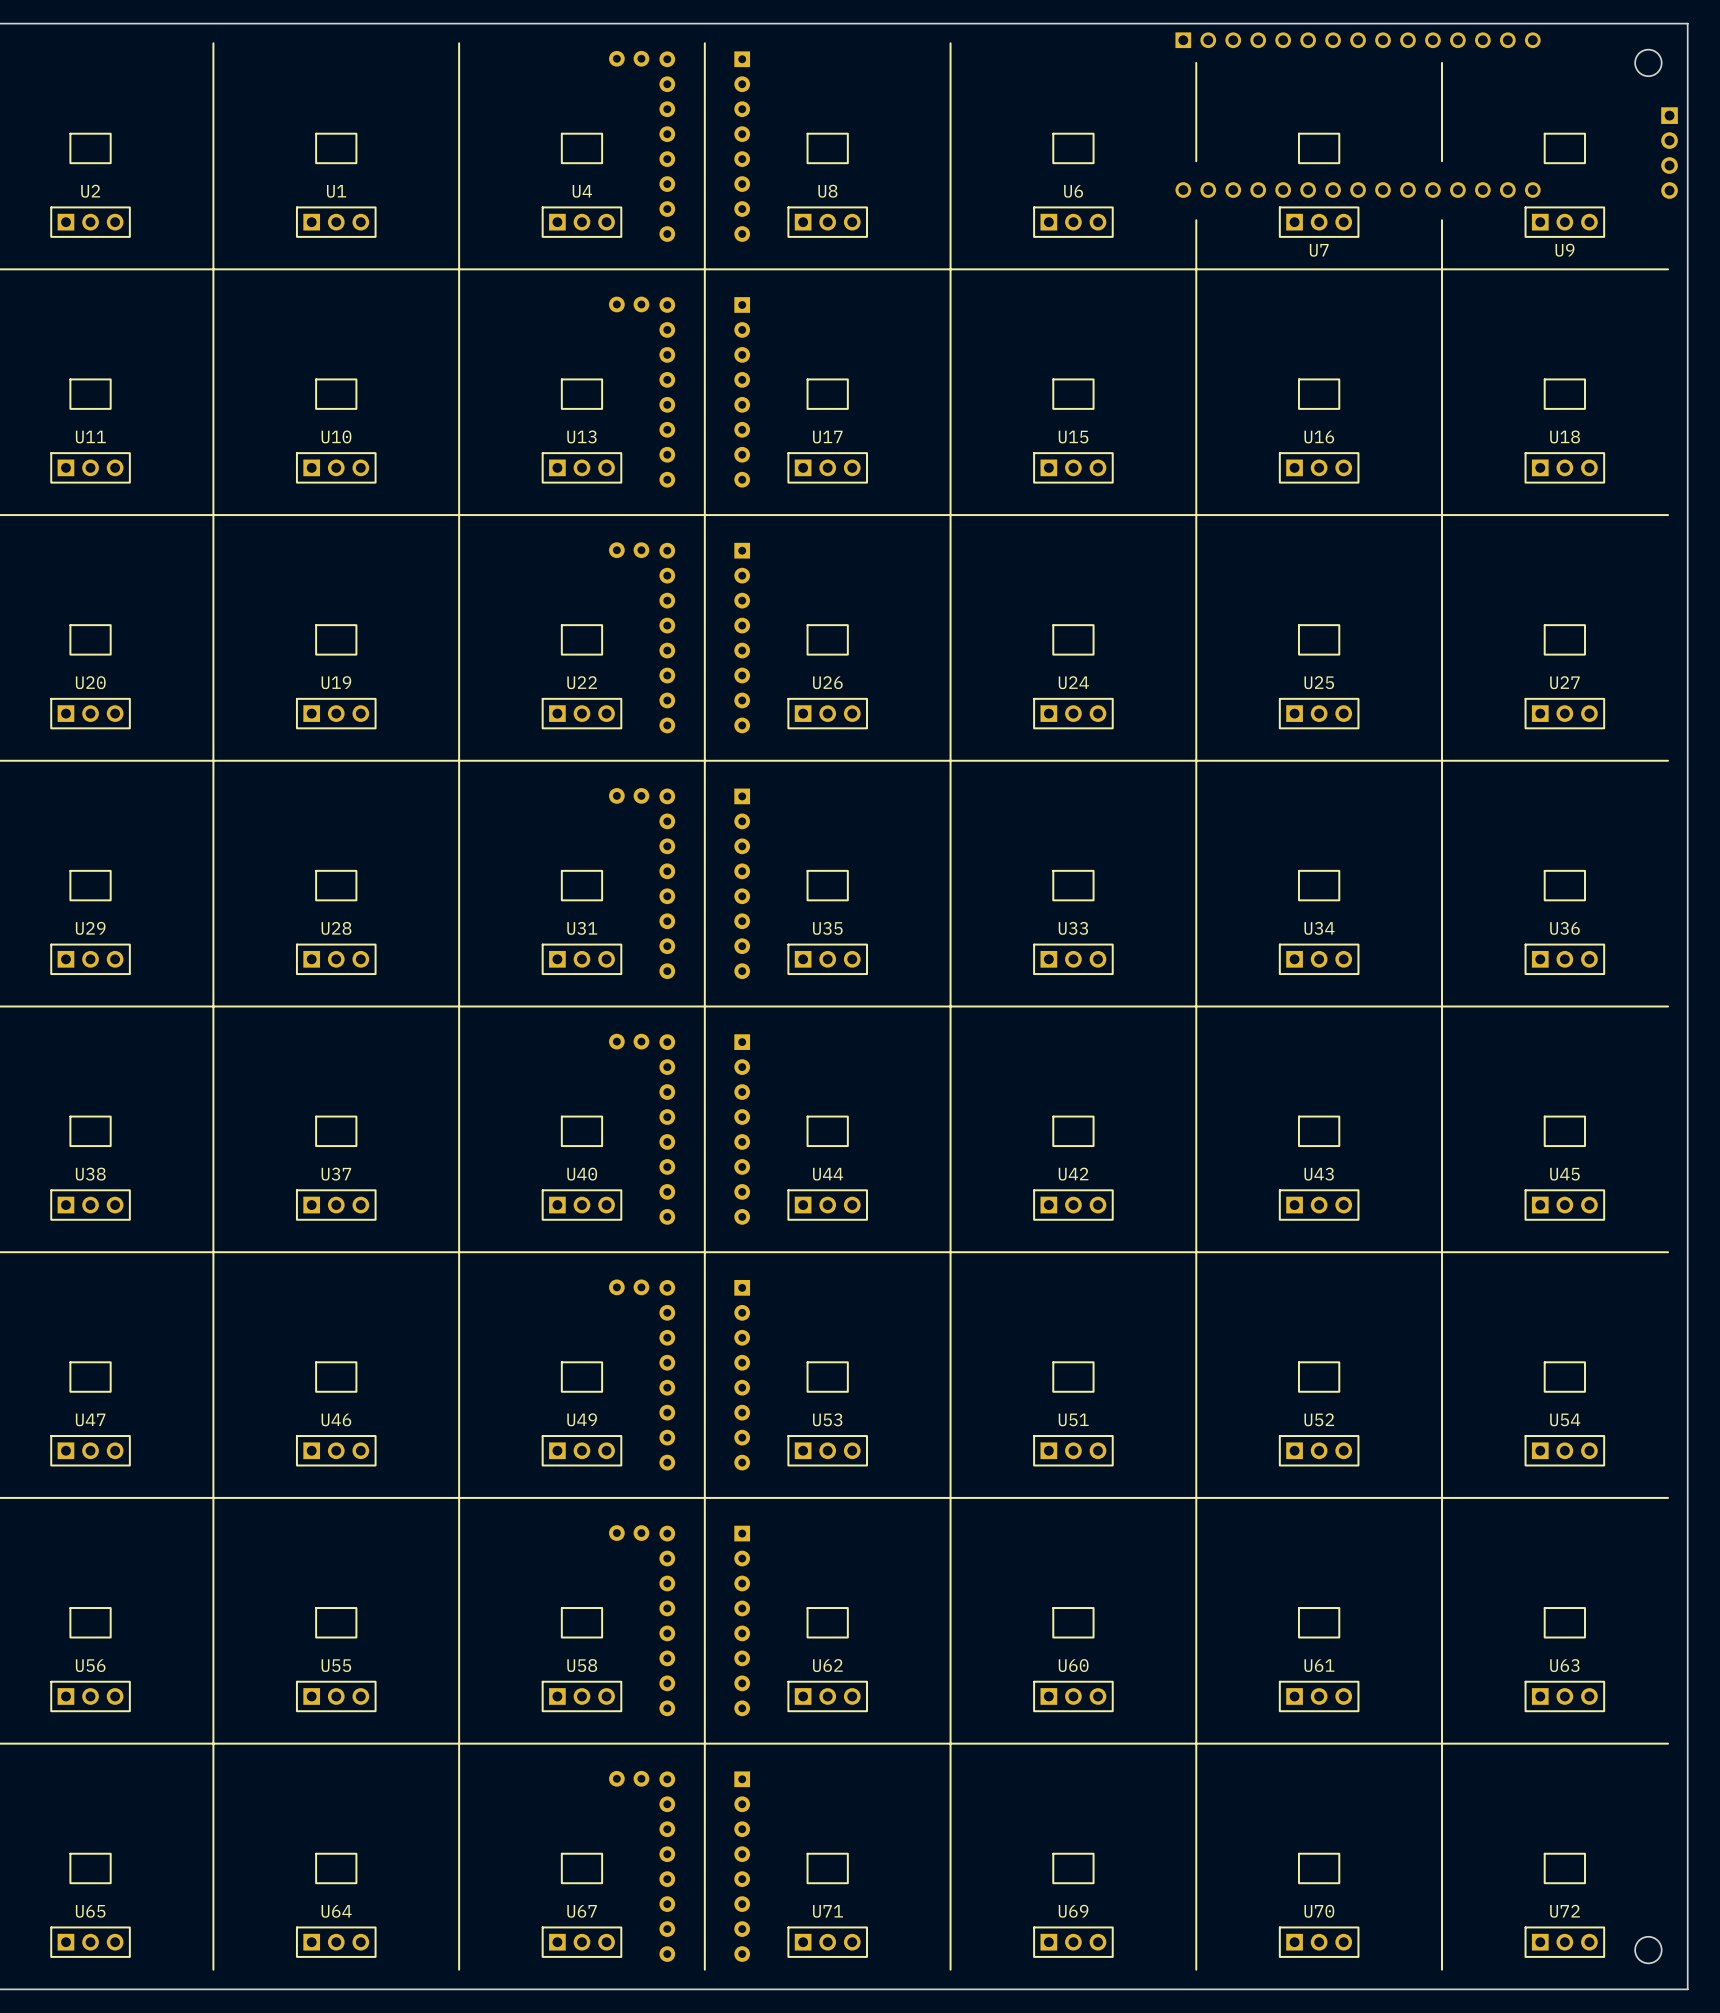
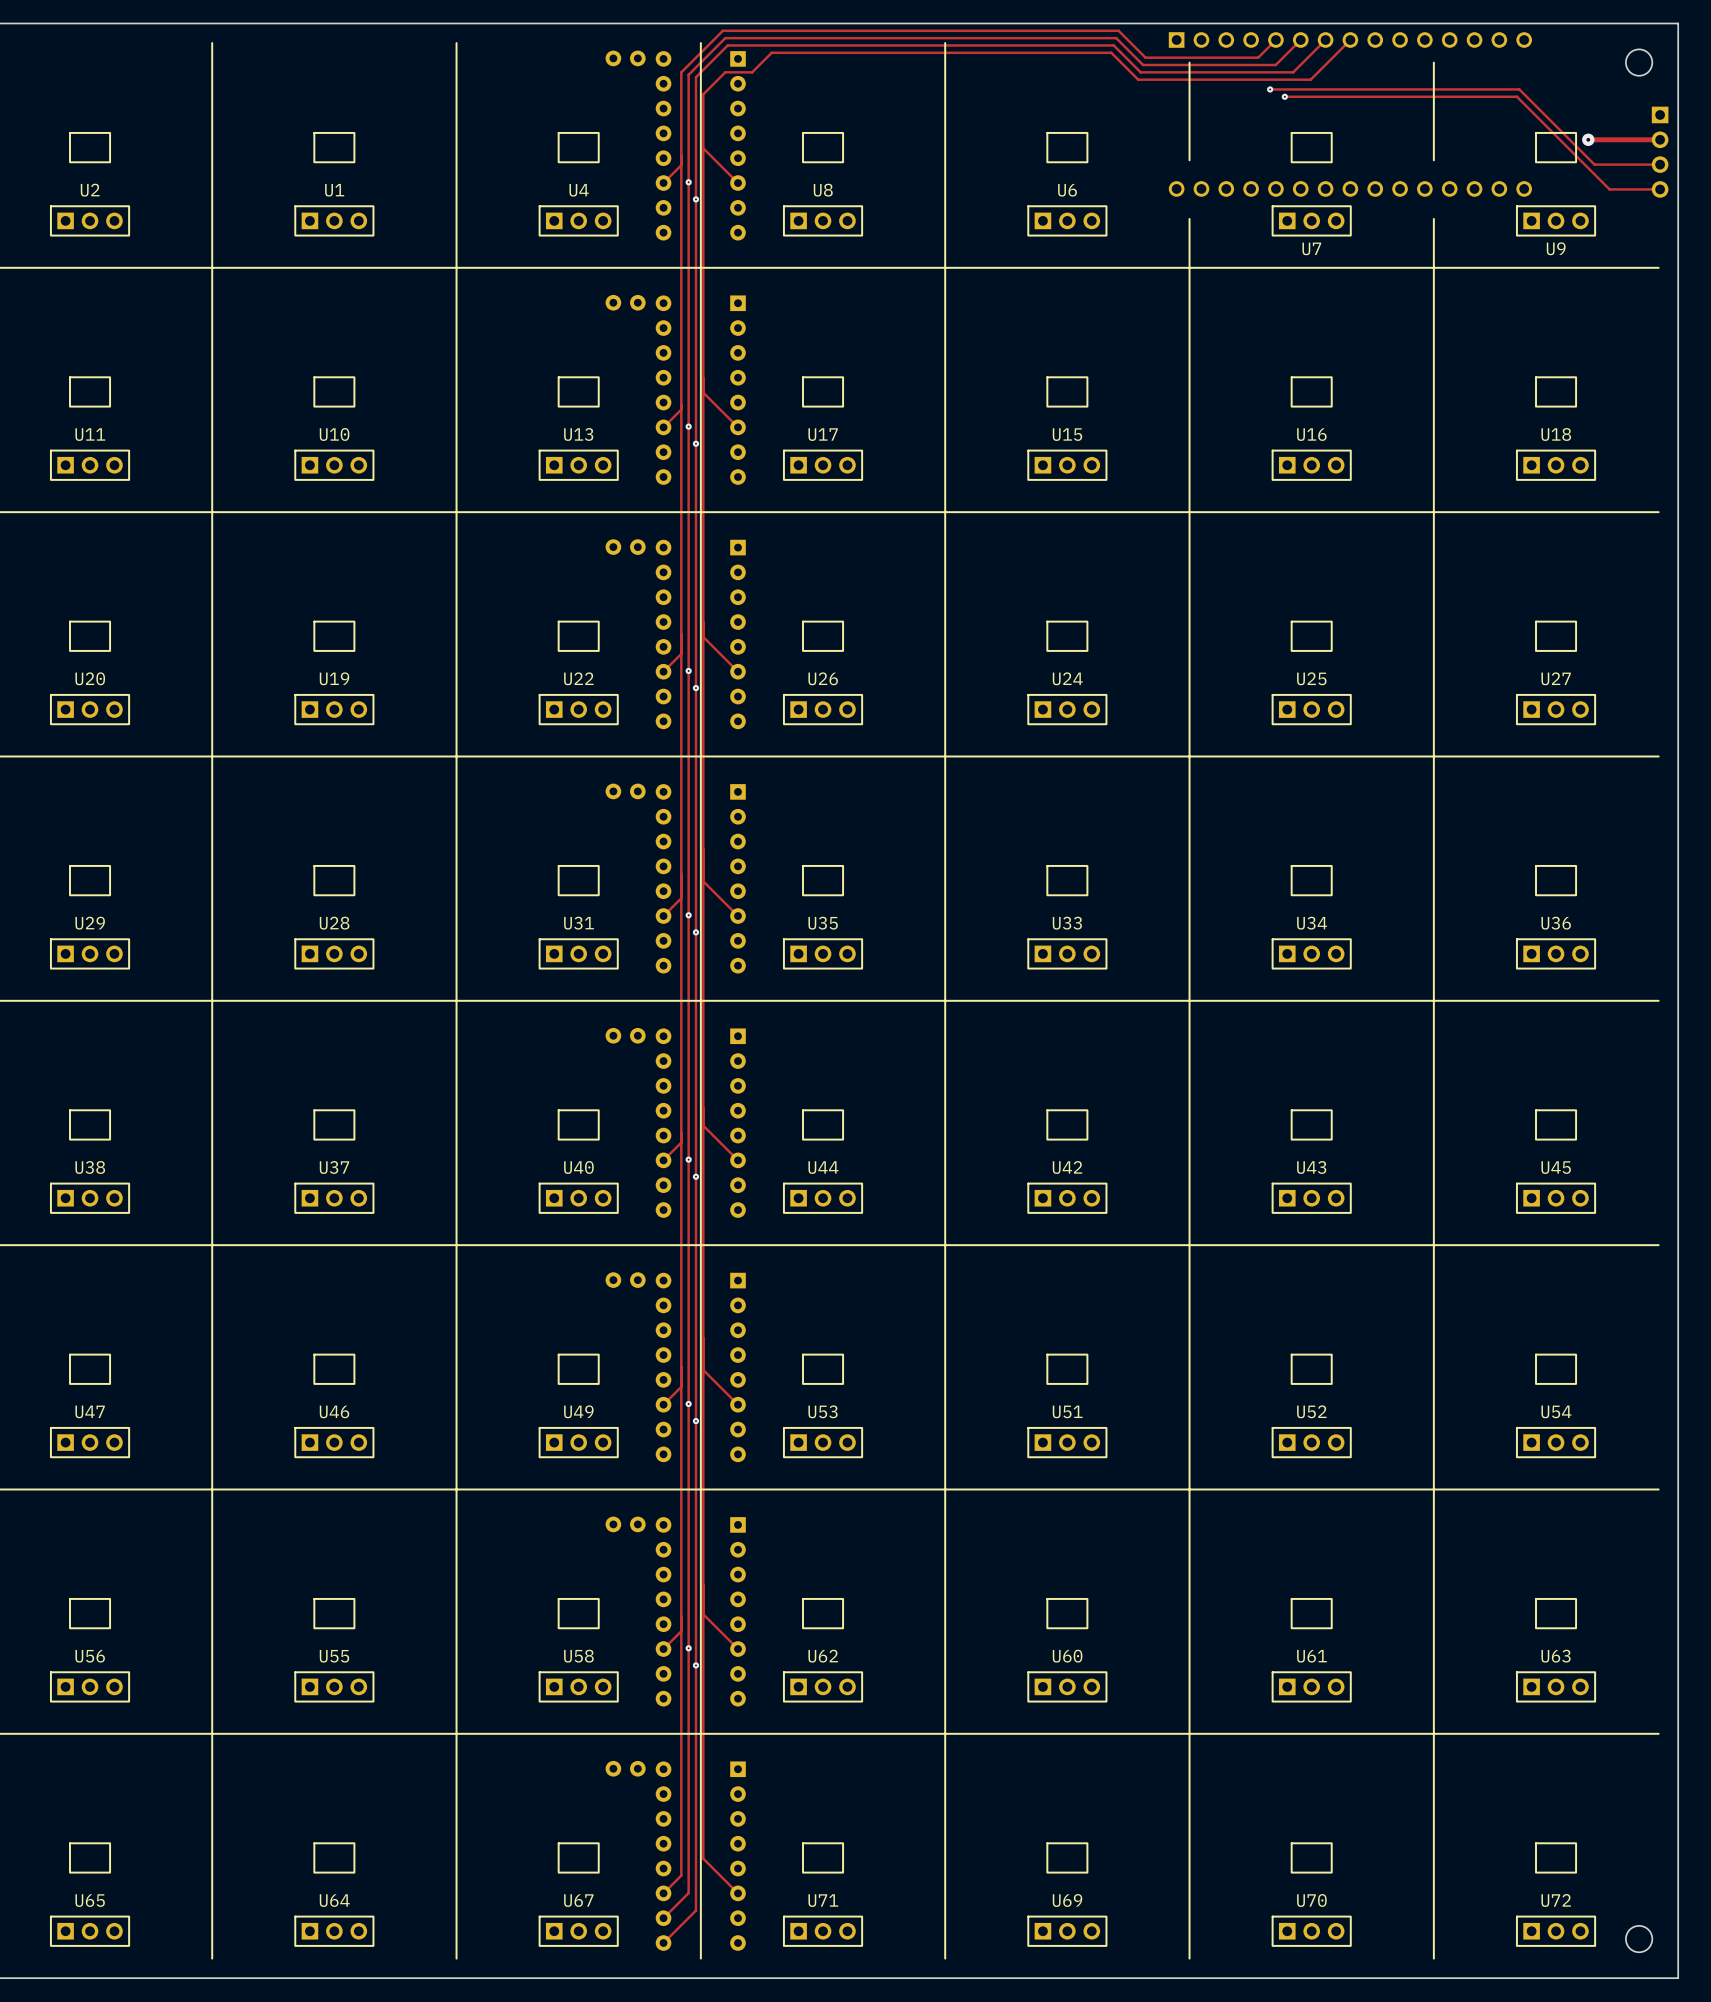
track: none -> (1275, 40) (1258, 57) (1145, 57) (1118, 30) (722, 30) (681, 72) (681, 1875) (663, 1893)
track: none -> (1300, 40) (1275, 65) (1143, 65) (1116, 38) (725, 38) (688, 74) (688, 1893) (663, 1918)
track: none -> (1325, 40) (1293, 72) (1140, 72) (1113, 45) (727, 45) (695, 77) (695, 1910) (663, 1943)
track: none -> (1350, 40) (1310, 79) (1138, 79) (1111, 52) (771, 52) (752, 72) (725, 72) (703, 94) (703, 1858) (738, 1893)
track: none -> (1270, 89) (1519, 89) (1594, 164) (1660, 164)
via: none -> (1270, 89)
track: none -> (1284, 96) (1516, 96) (1609, 189) (1660, 189)
via: none -> (1284, 96)
track: none -> (1588, 139) (1660, 139)
via: none -> (1588, 139)
track: none -> (703, 148) (738, 183)
track: none -> (681, 165) (663, 183)
via: none -> (688, 182)
via: none -> (695, 199)
track: none -> (703, 392) (738, 427)
track: none -> (681, 409) (663, 427)
via: none -> (688, 426)
via: none -> (695, 443)
track: none -> (703, 637) (738, 671)
track: none -> (681, 653) (663, 671)
via: none -> (688, 670)
via: none -> (695, 688)
track: none -> (703, 881) (738, 916)
track: none -> (681, 898) (663, 916)
via: none -> (688, 915)
via: none -> (695, 932)
track: none -> (703, 1125) (738, 1160)
track: none -> (681, 1142) (663, 1160)
via: none -> (688, 1159)
via: none -> (695, 1176)
track: none -> (703, 1370) (738, 1404)
track: none -> (681, 1386) (663, 1404)
via: none -> (688, 1403)
via: none -> (695, 1421)
track: none -> (703, 1614) (738, 1649)
track: none -> (681, 1631) (663, 1649)
via: none -> (688, 1648)
via: none -> (695, 1665)

